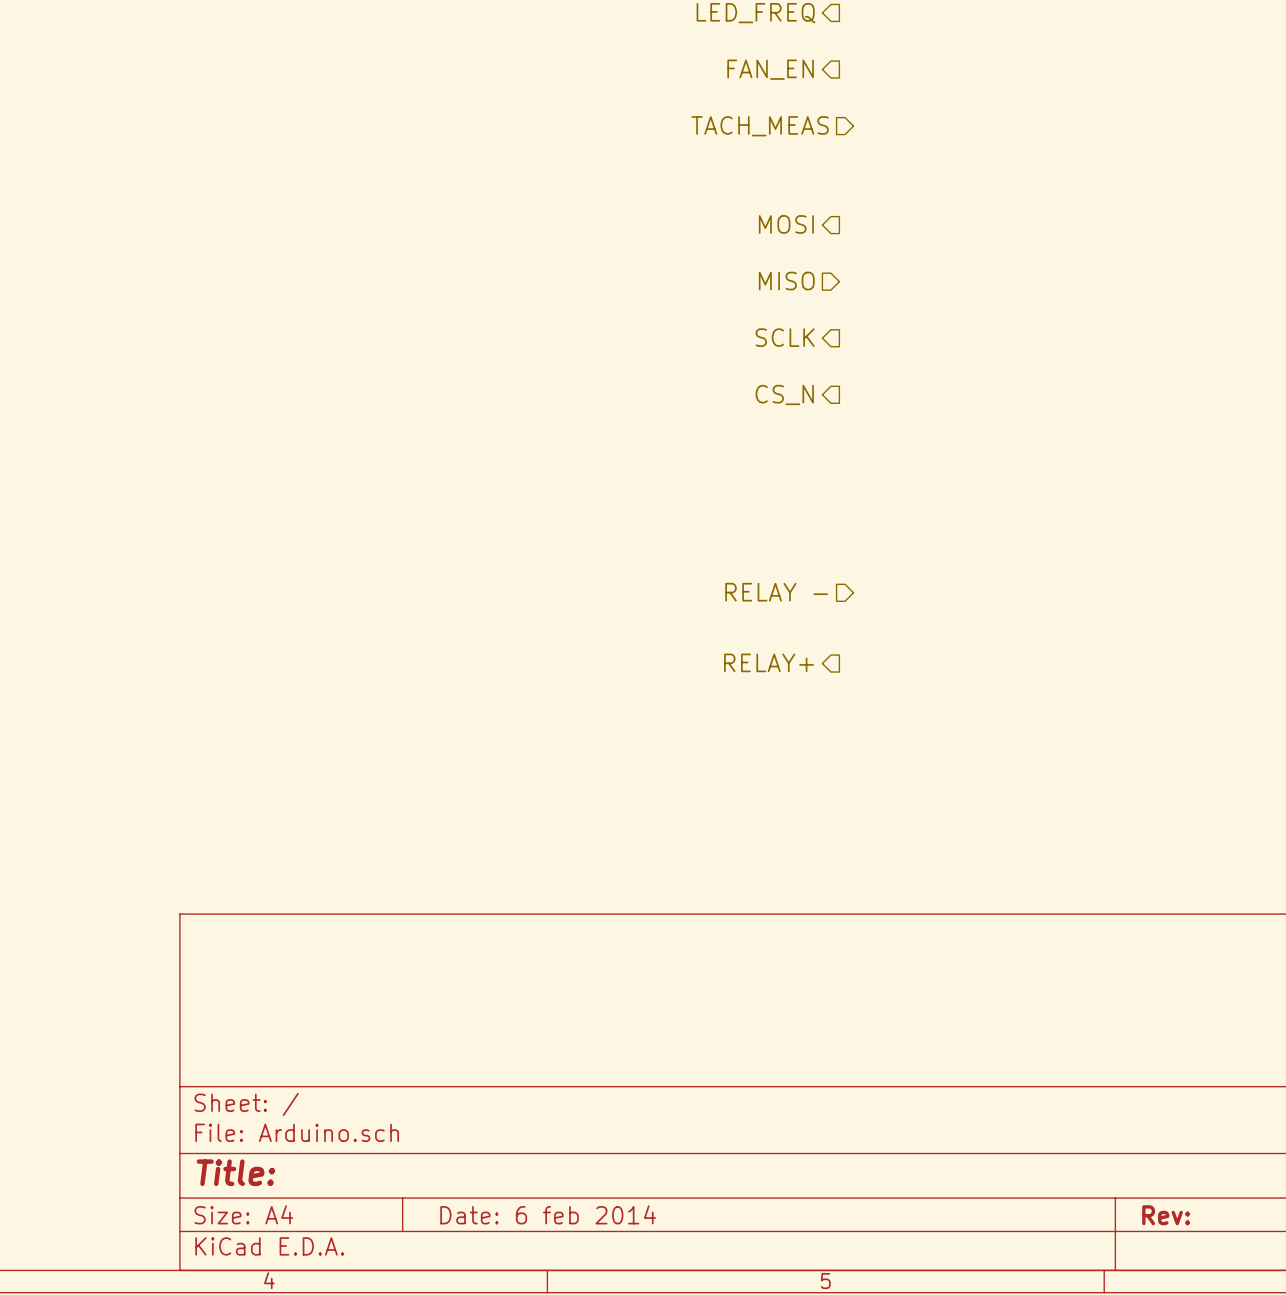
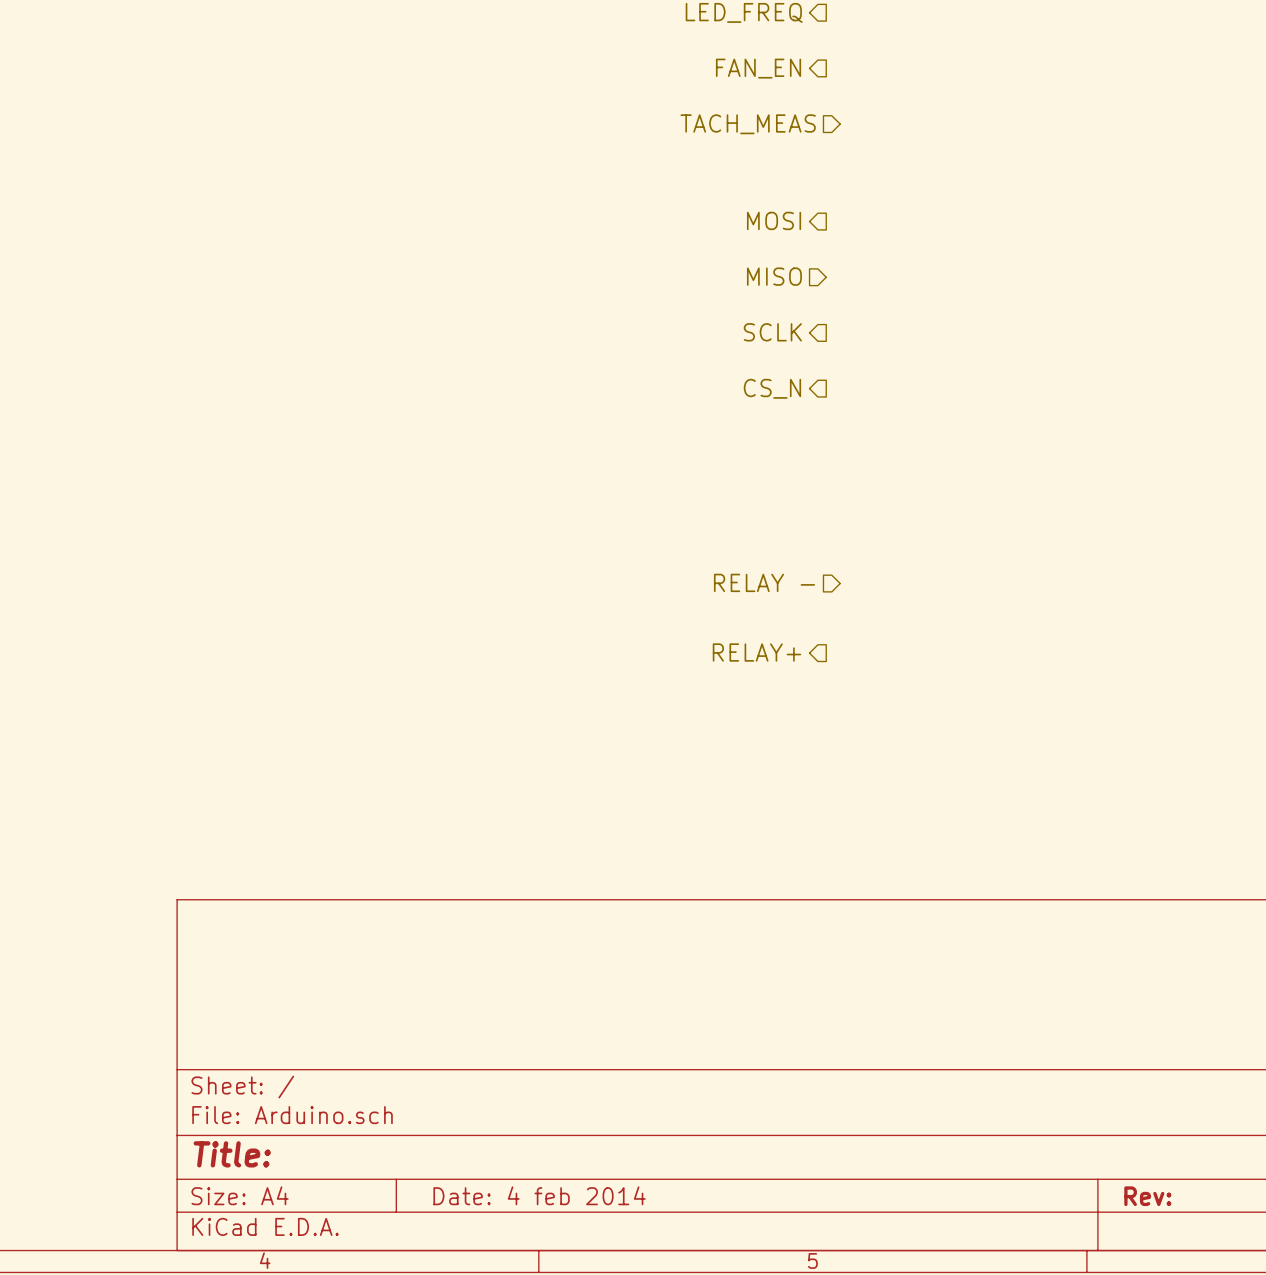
title block: Date: 6 feb 2014 (548, 1214) -> Date: 4 feb 2014 (539, 1195)

